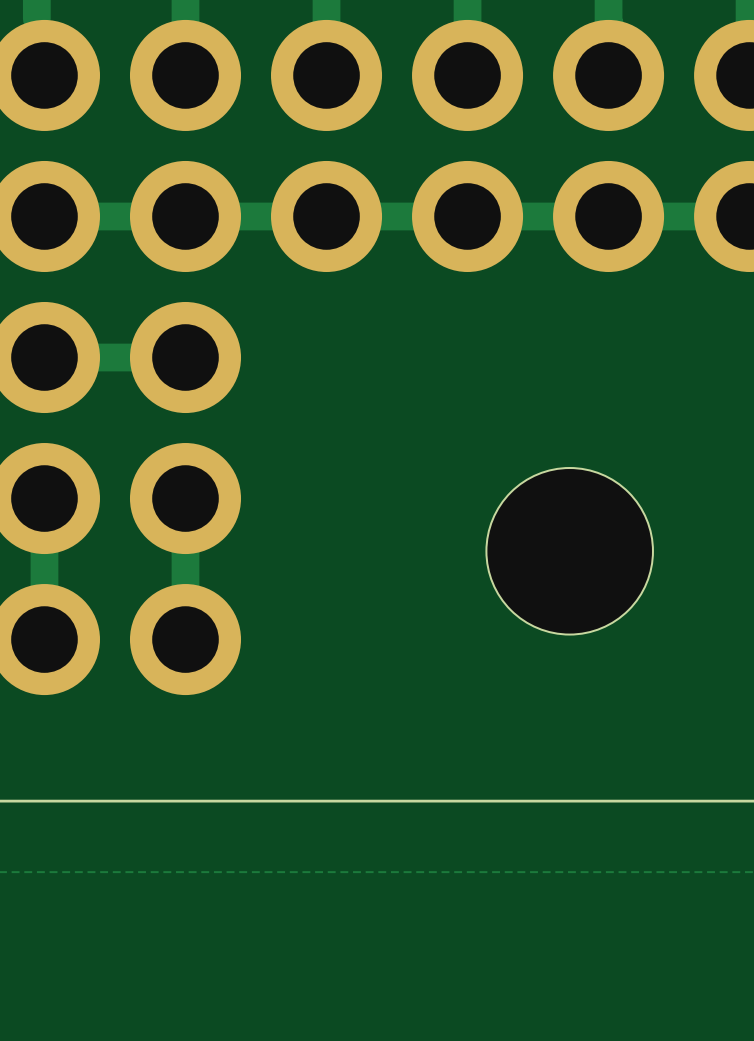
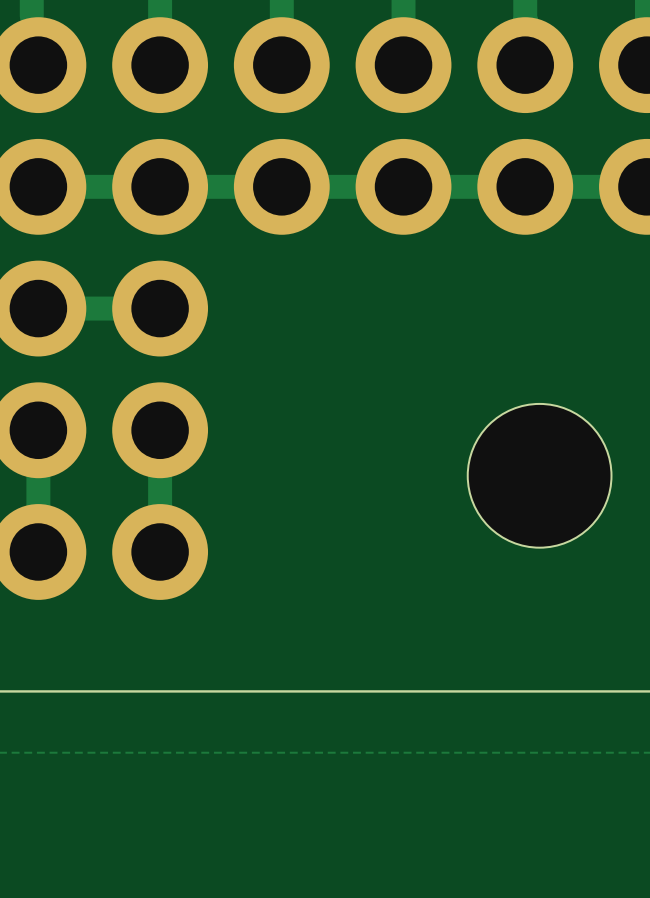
part position: (569, 551) -> (539, 475)

